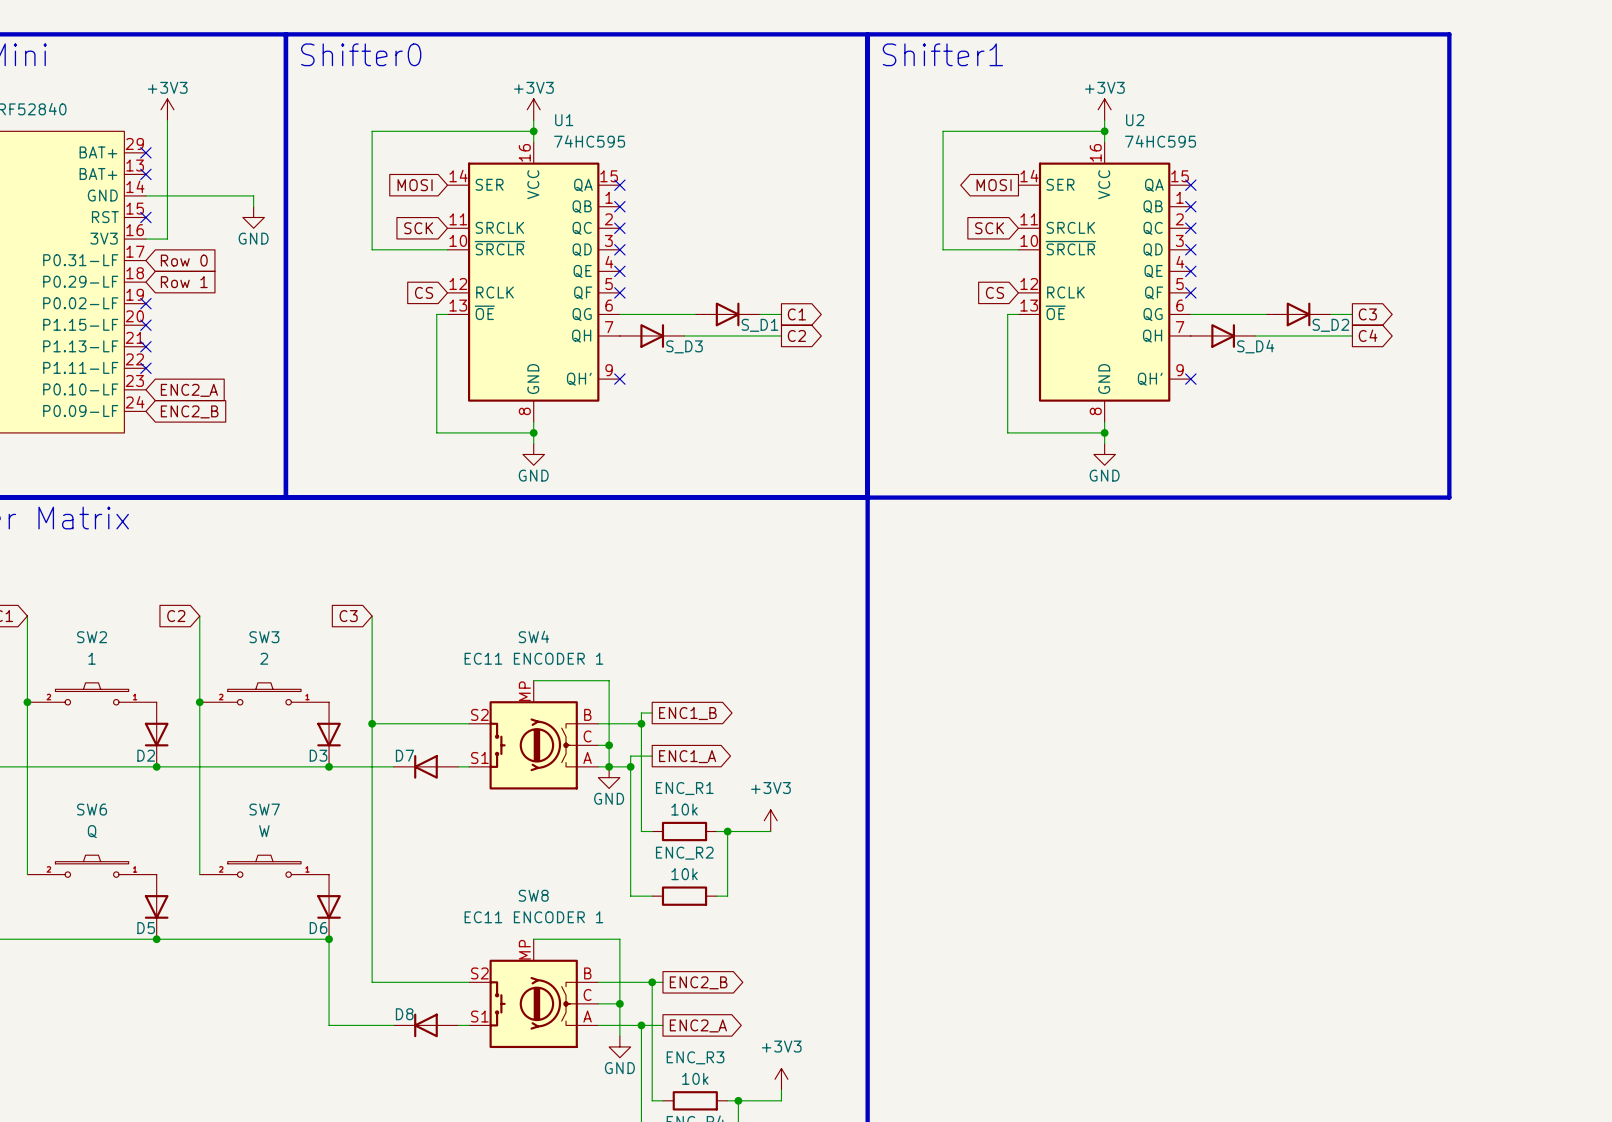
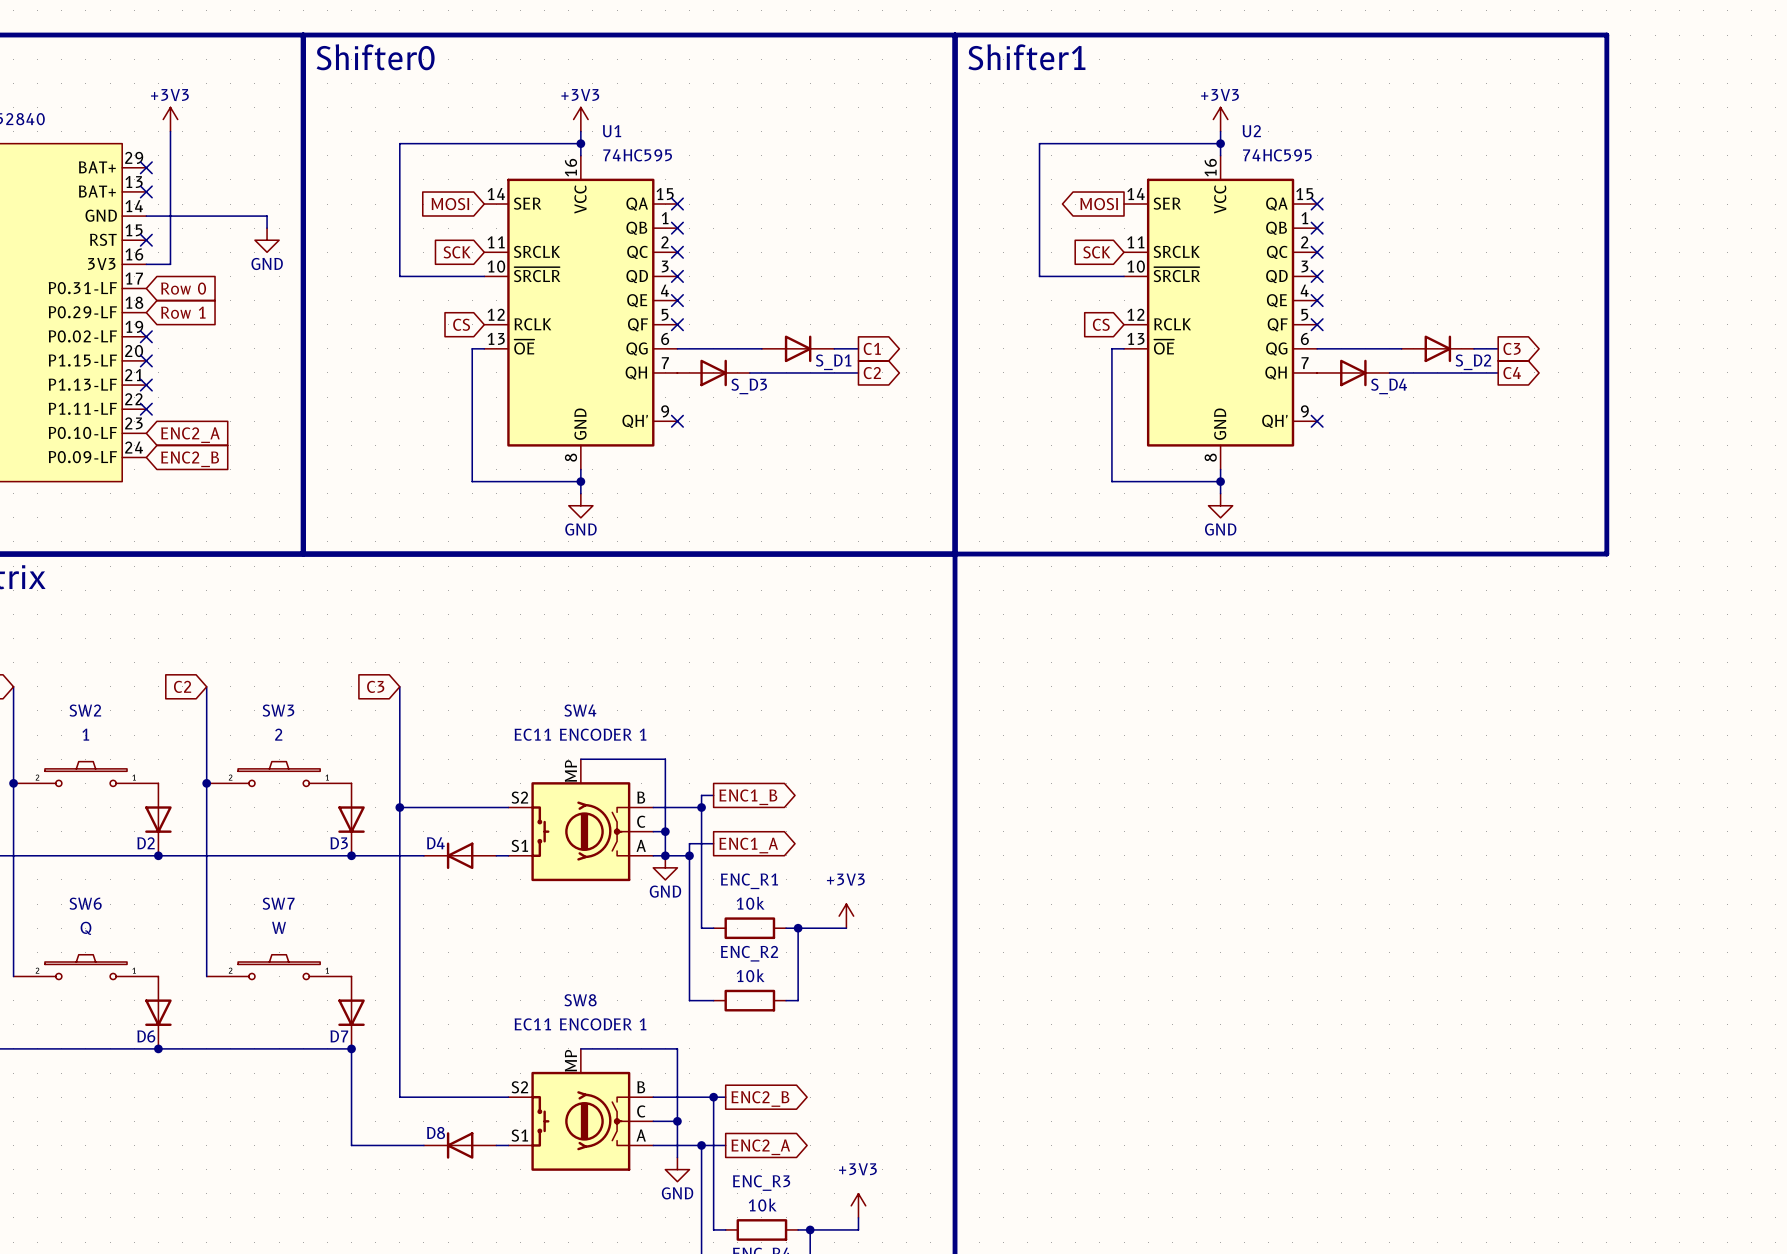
D7 name: D7 (404, 755) -> D4 (435, 843)
D5 name: D5 (146, 928) -> D6 (146, 1036)
D6 name: D6 (318, 928) -> D7 (339, 1036)

